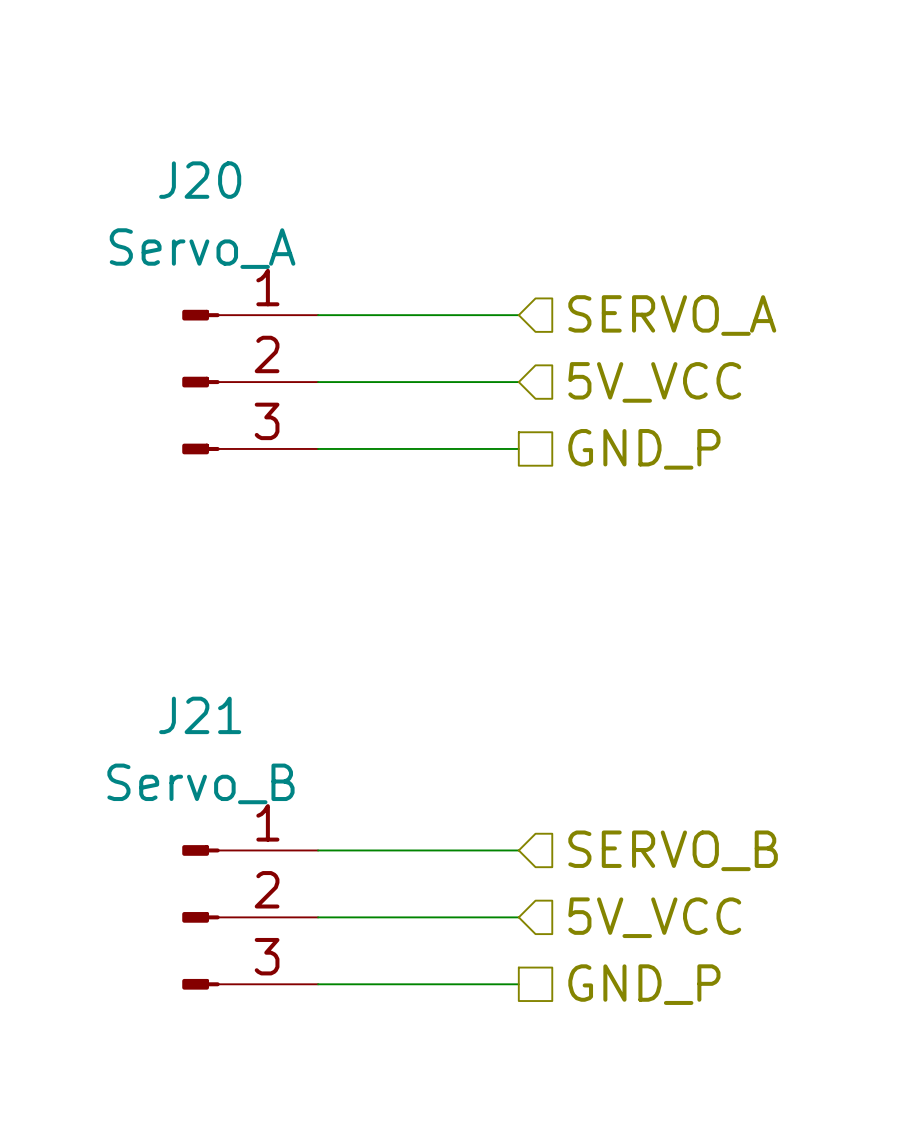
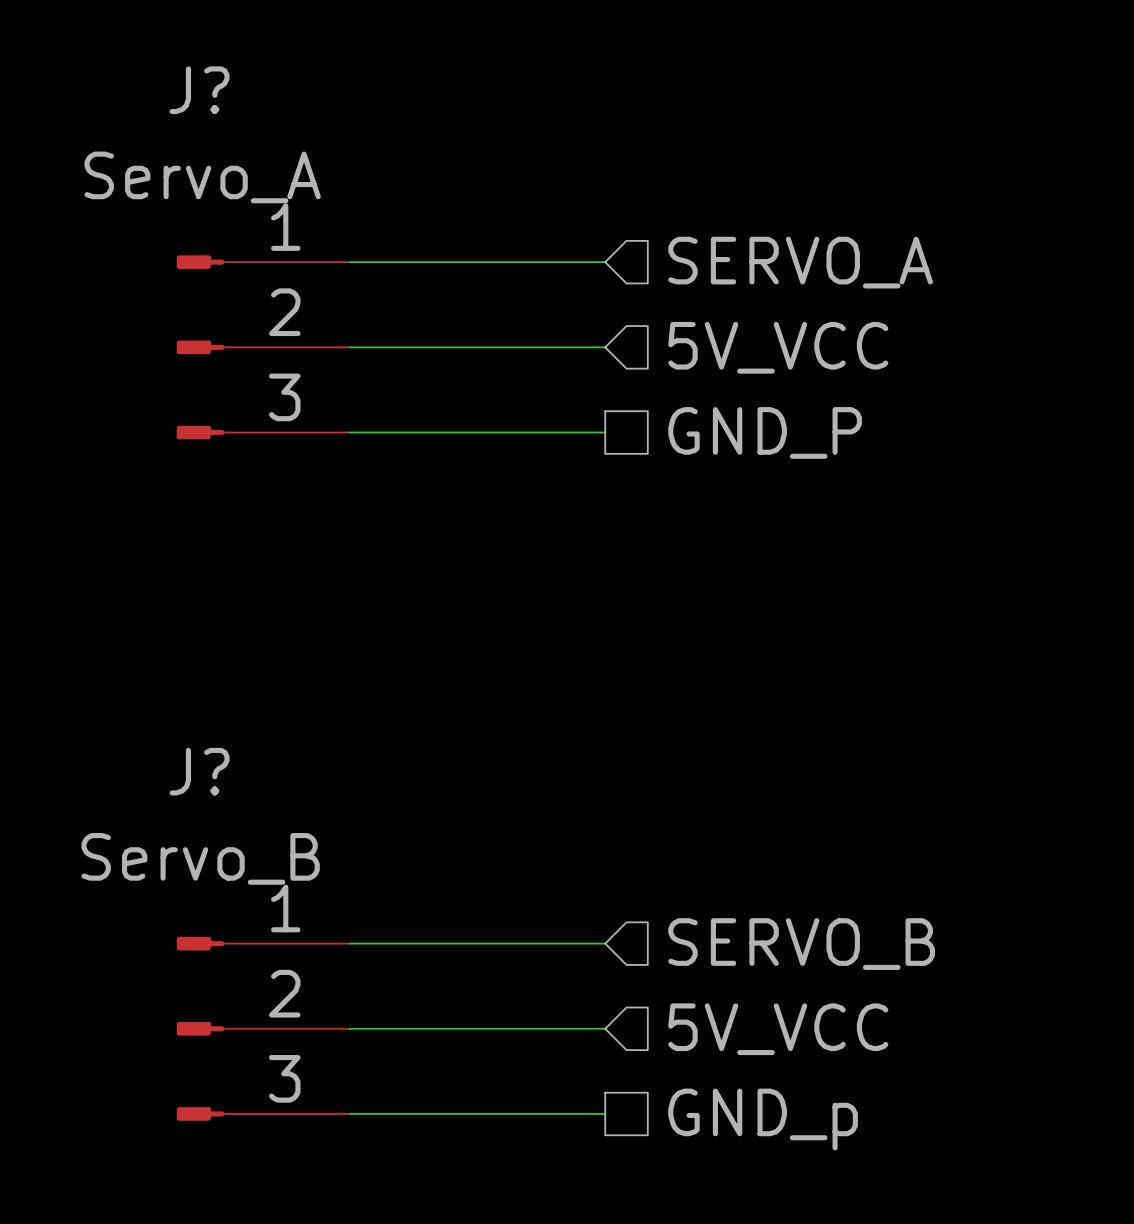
J20 name: J20 (200, 180) -> J? (199, 90)
J21 name: J21 (200, 715) -> J? (199, 771)
hierarchical label: GND_P (644, 984) -> GND_p (763, 1119)

